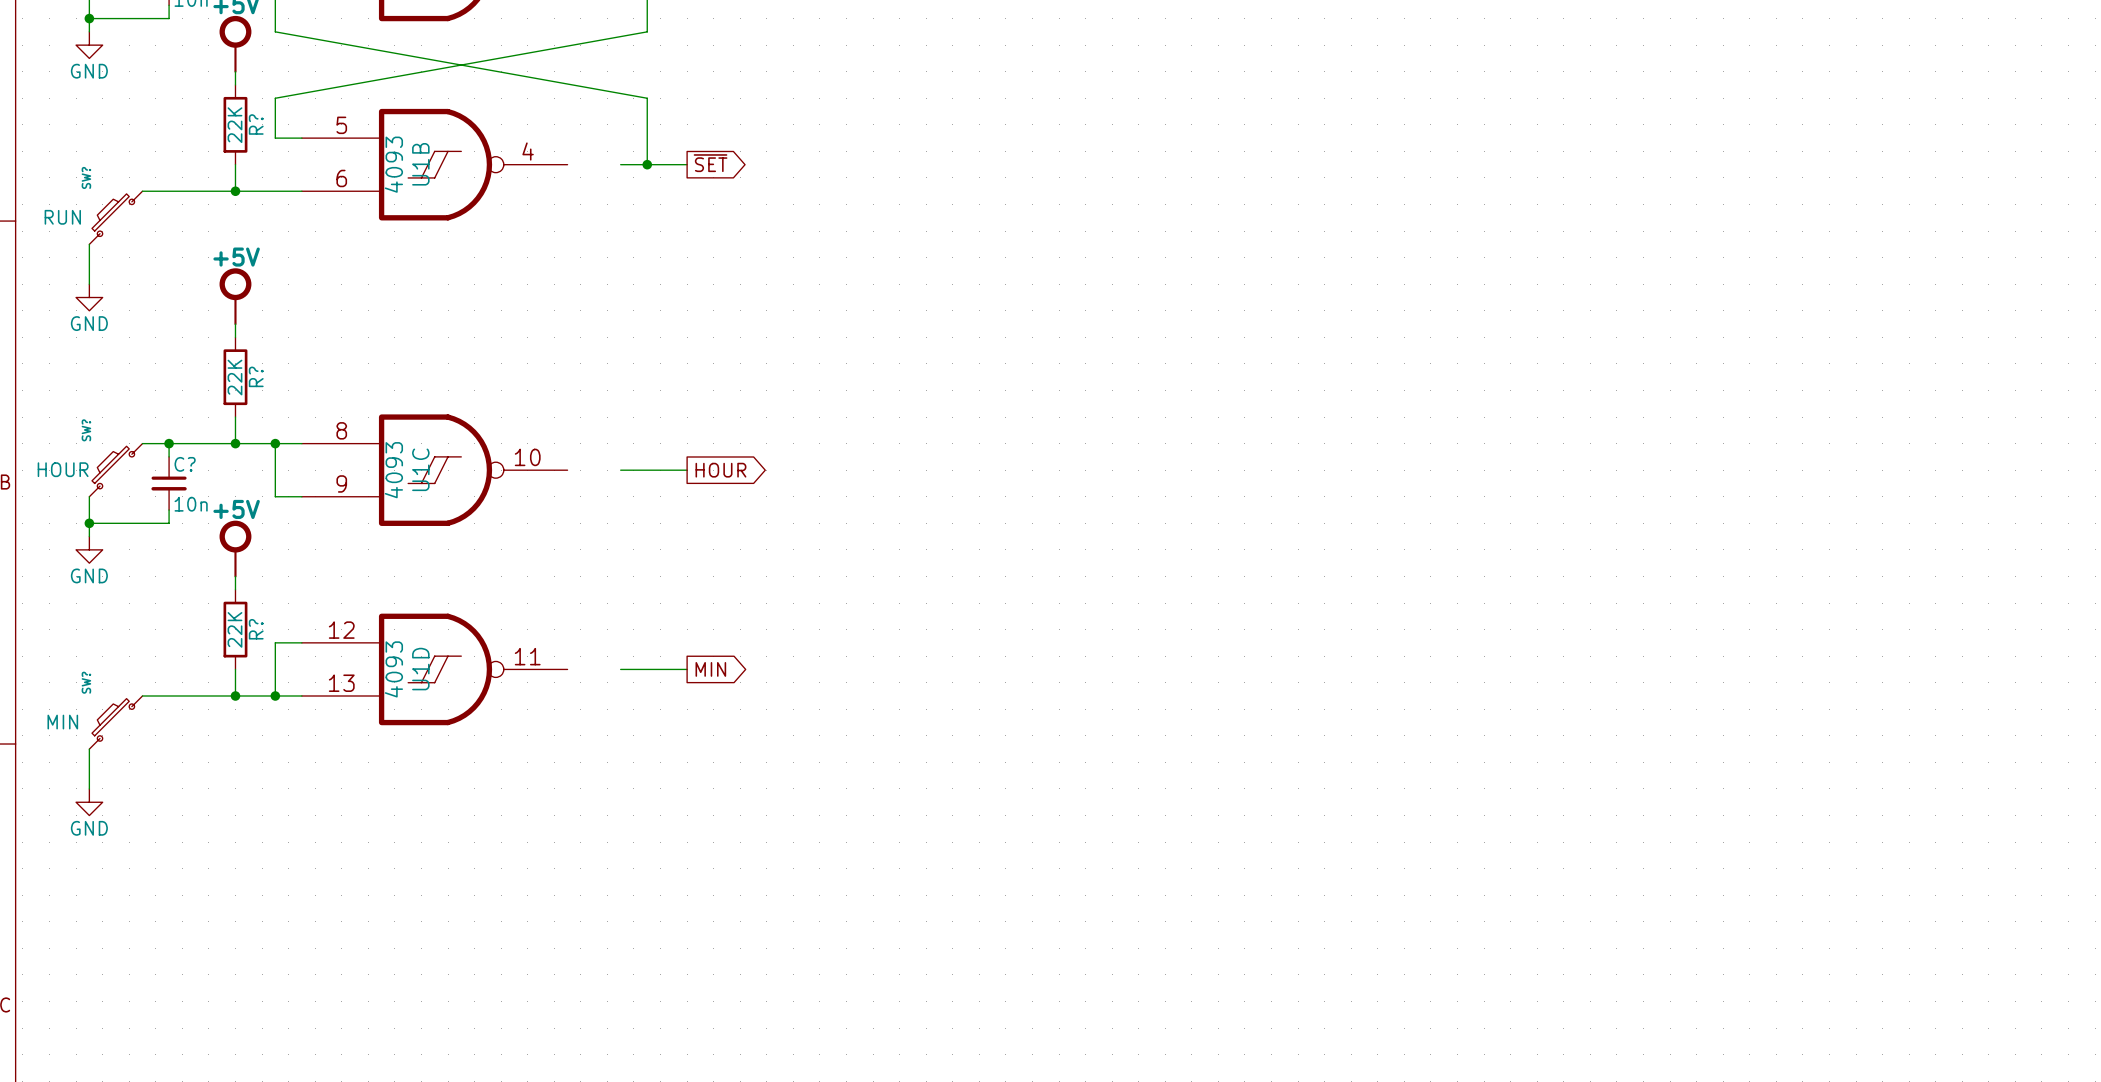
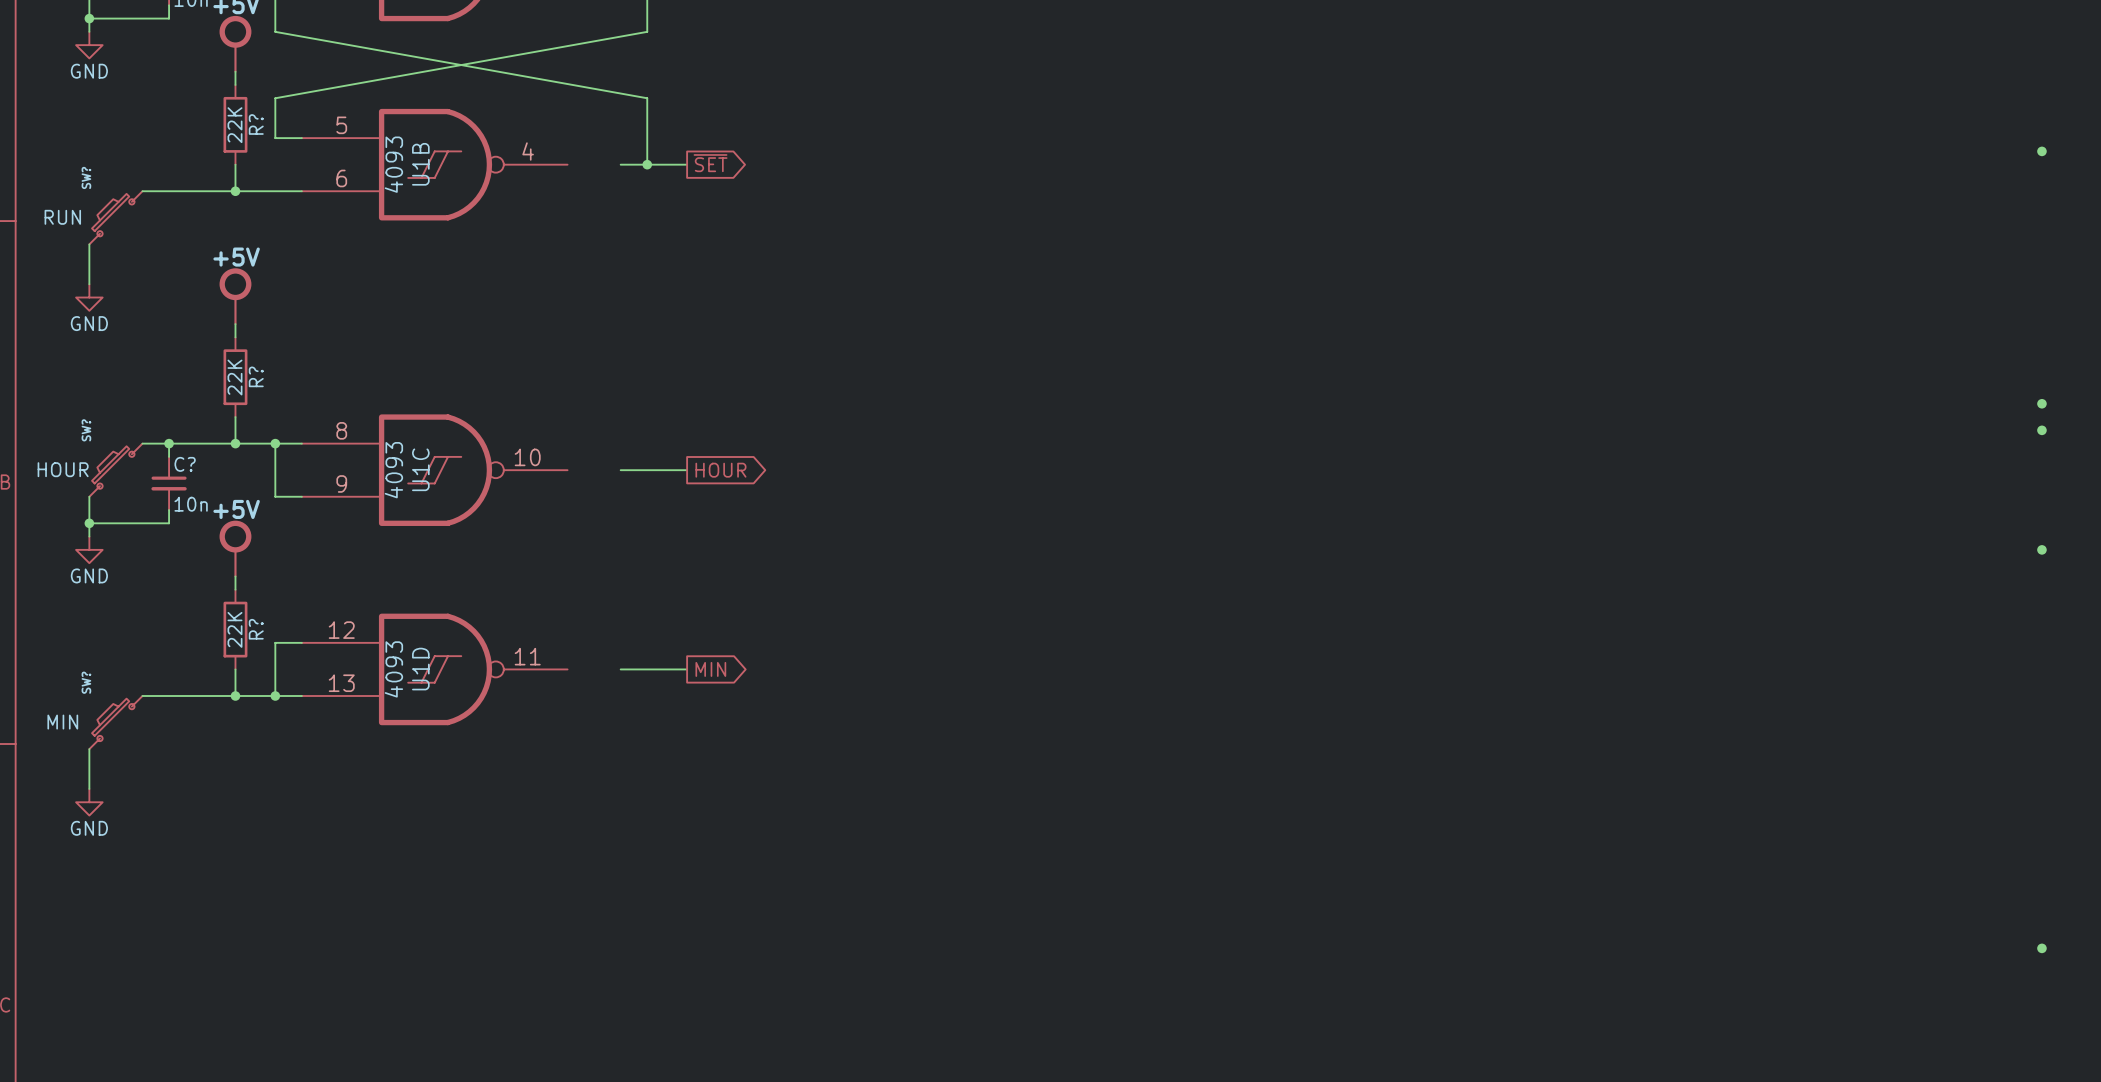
junction: none -> (2041, 151)
junction: none -> (2041, 403)
junction: none -> (2041, 430)
junction: none -> (2041, 549)
junction: none -> (2041, 948)

